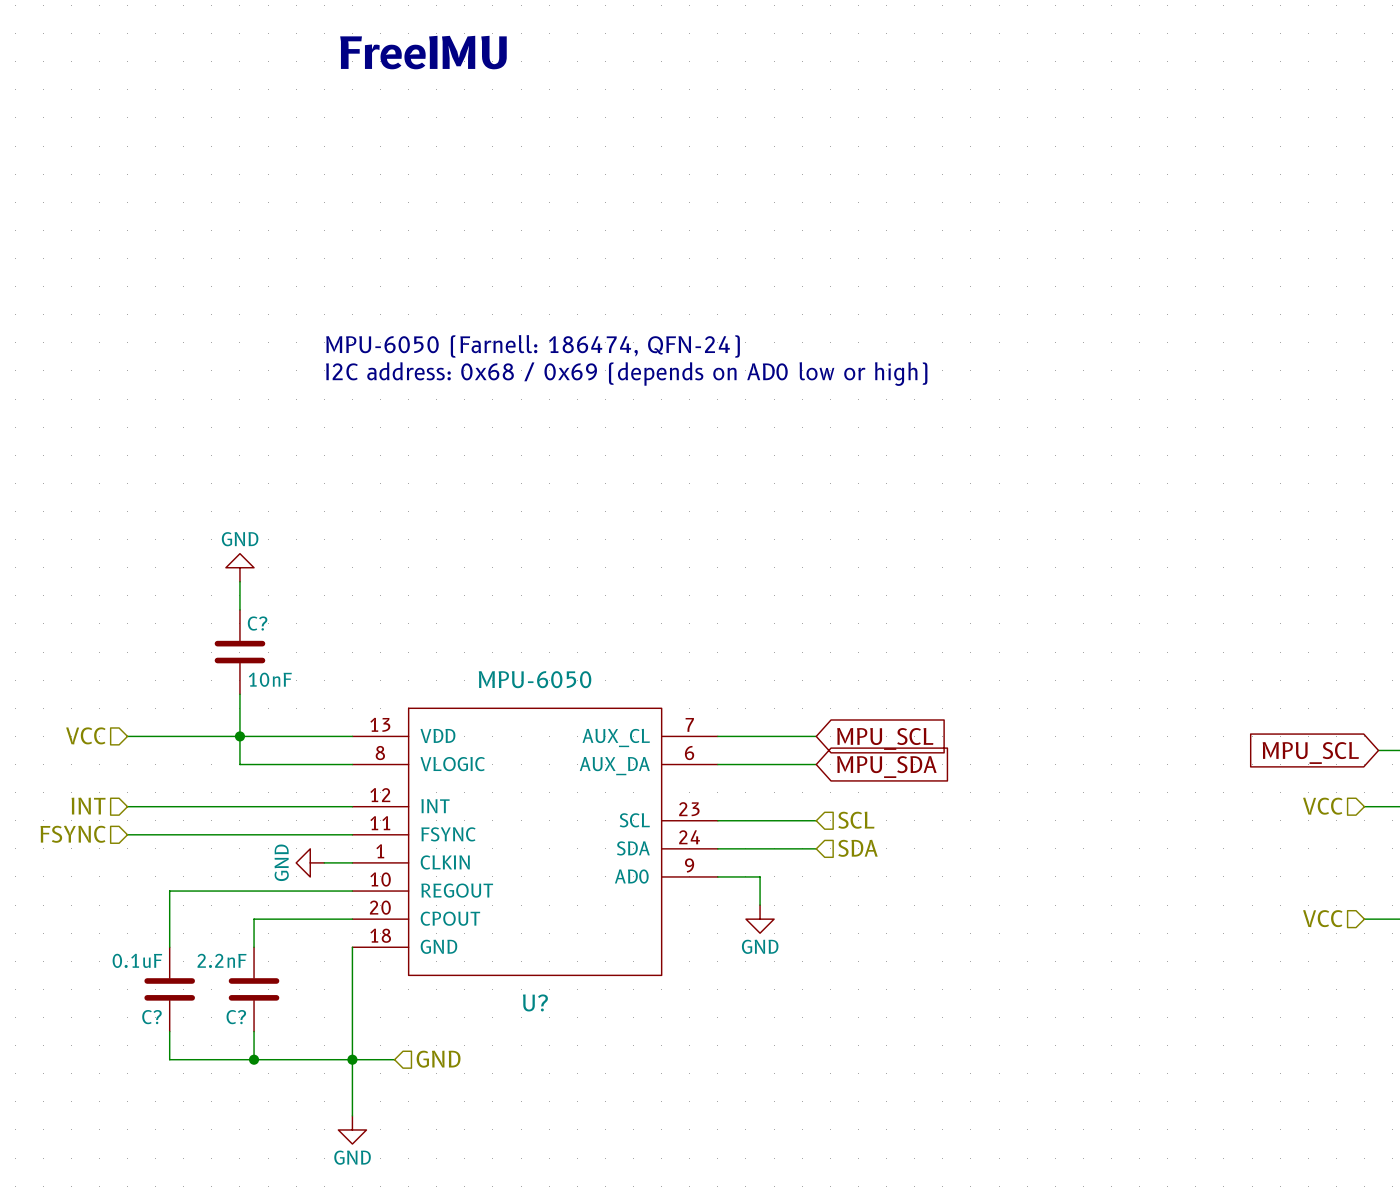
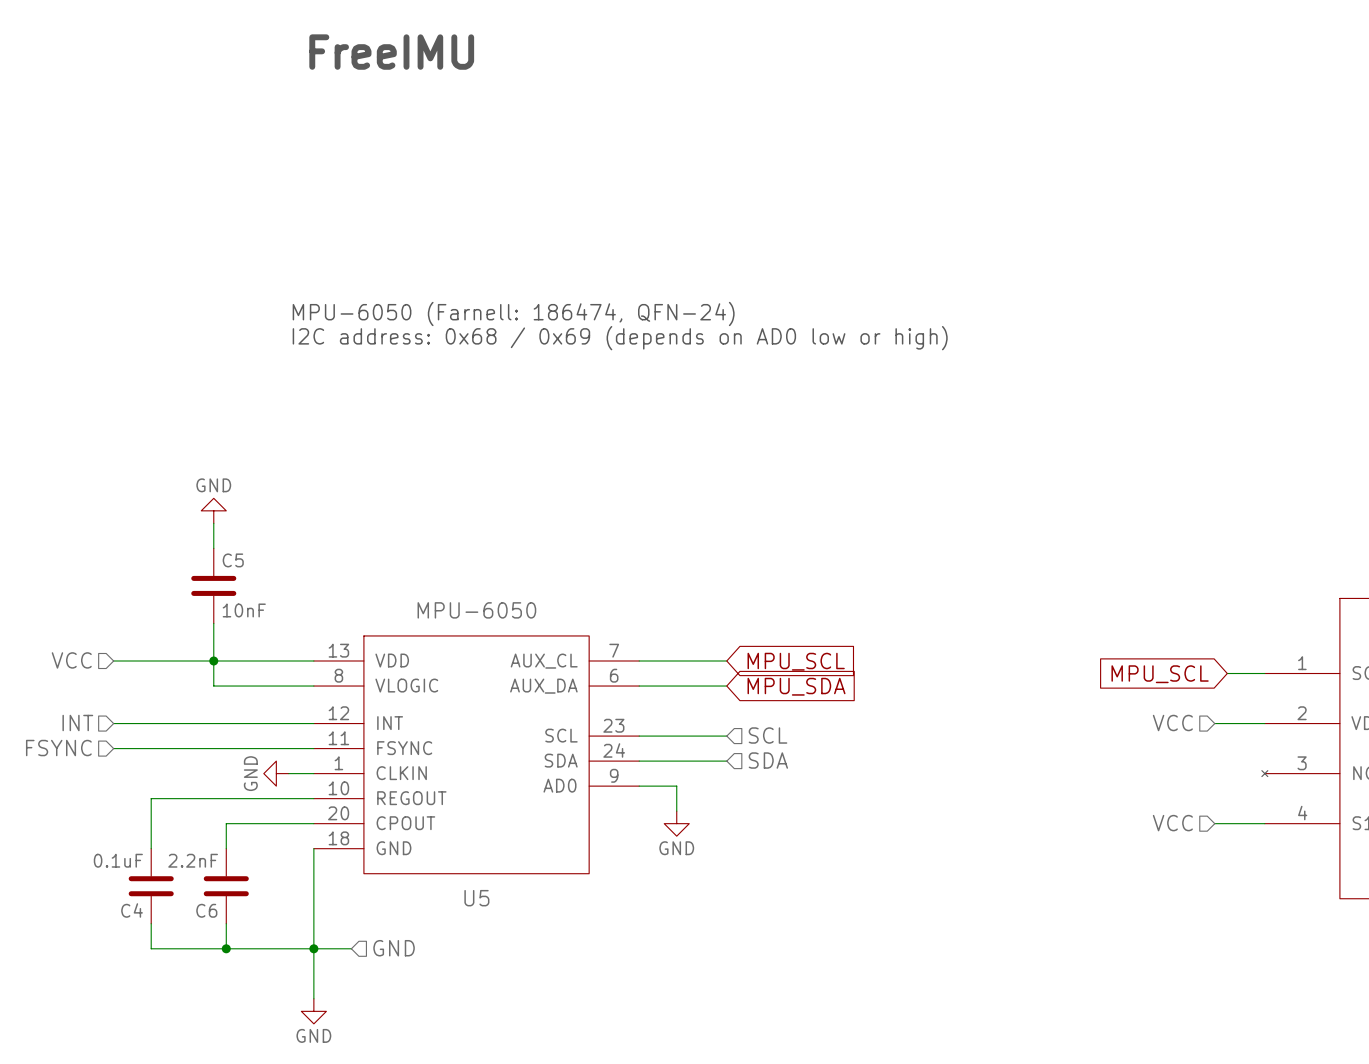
C? name: C? (257, 623) -> C5 (233, 560)
U? name: U? (535, 1002) -> U5 (476, 898)
C? name: C? (151, 1017) -> C4 (132, 910)
C? name: C? (236, 1017) -> C6 (206, 910)

